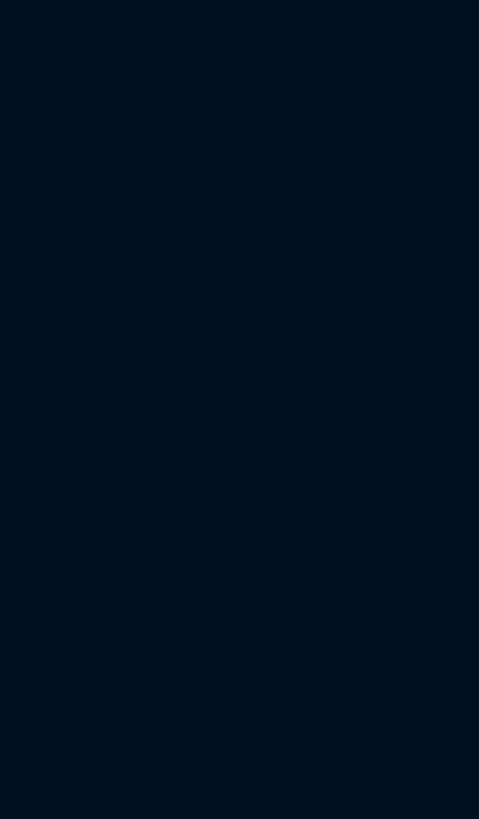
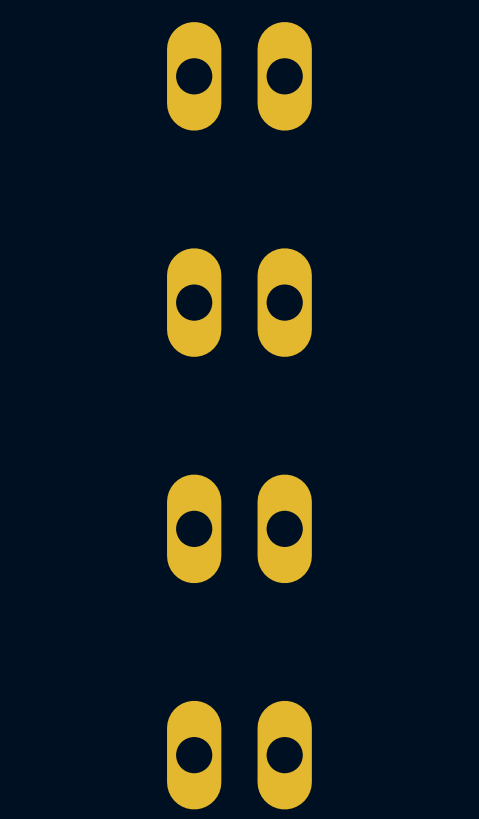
part: none -> (239, 76)
part: none -> (239, 302)
part: none -> (239, 528)
part: none -> (239, 755)

